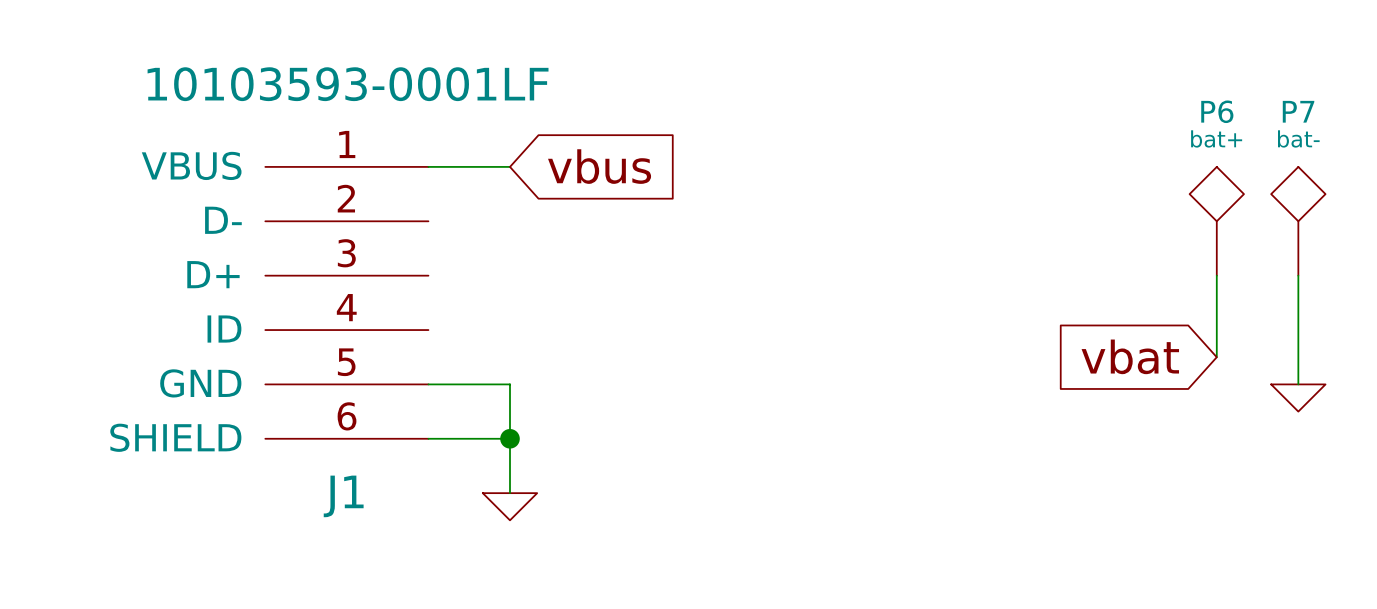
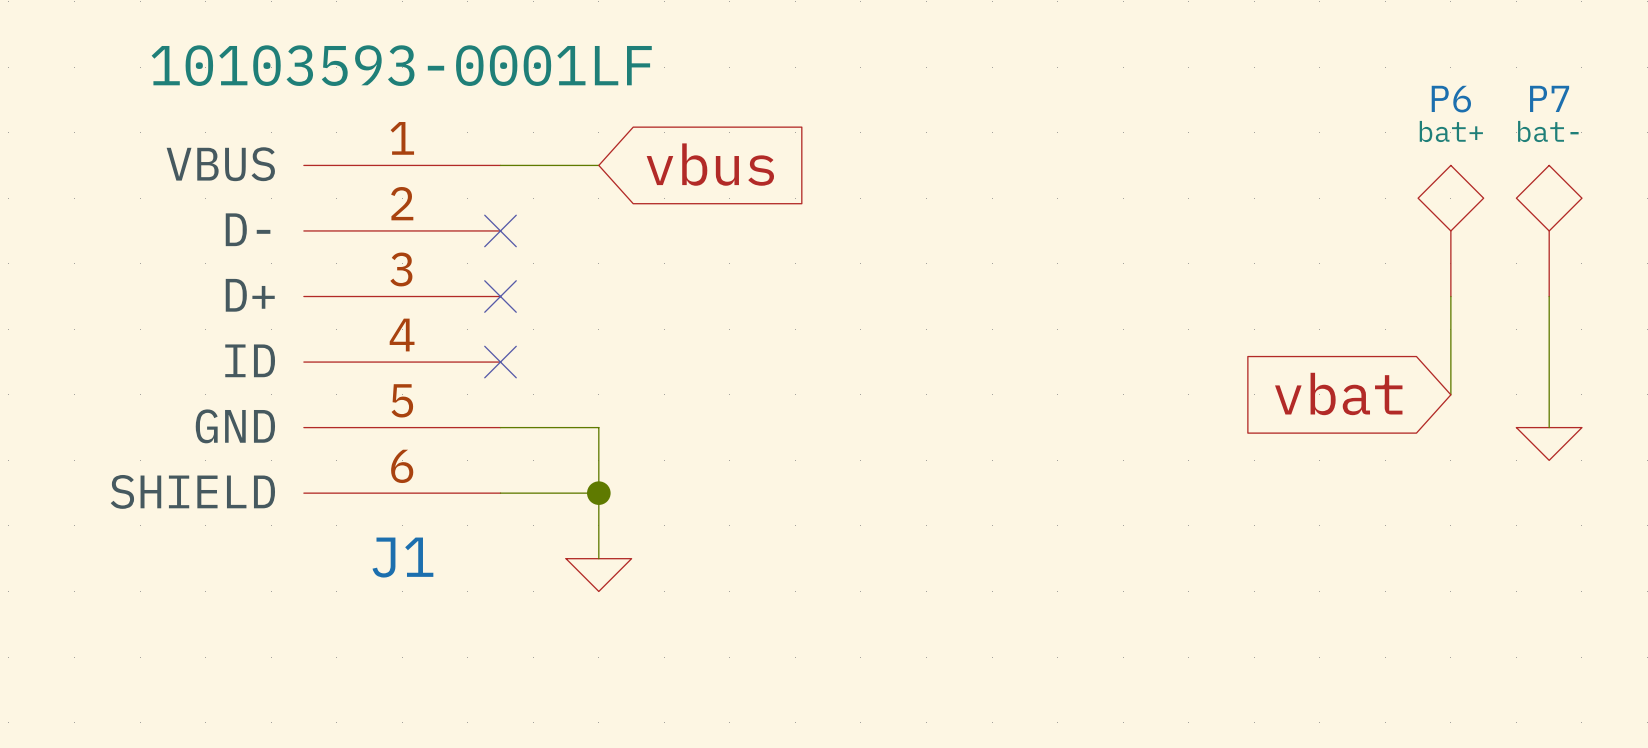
no-connect mark: none -> (500, 230)
no-connect mark: none -> (500, 296)
no-connect mark: none -> (500, 362)

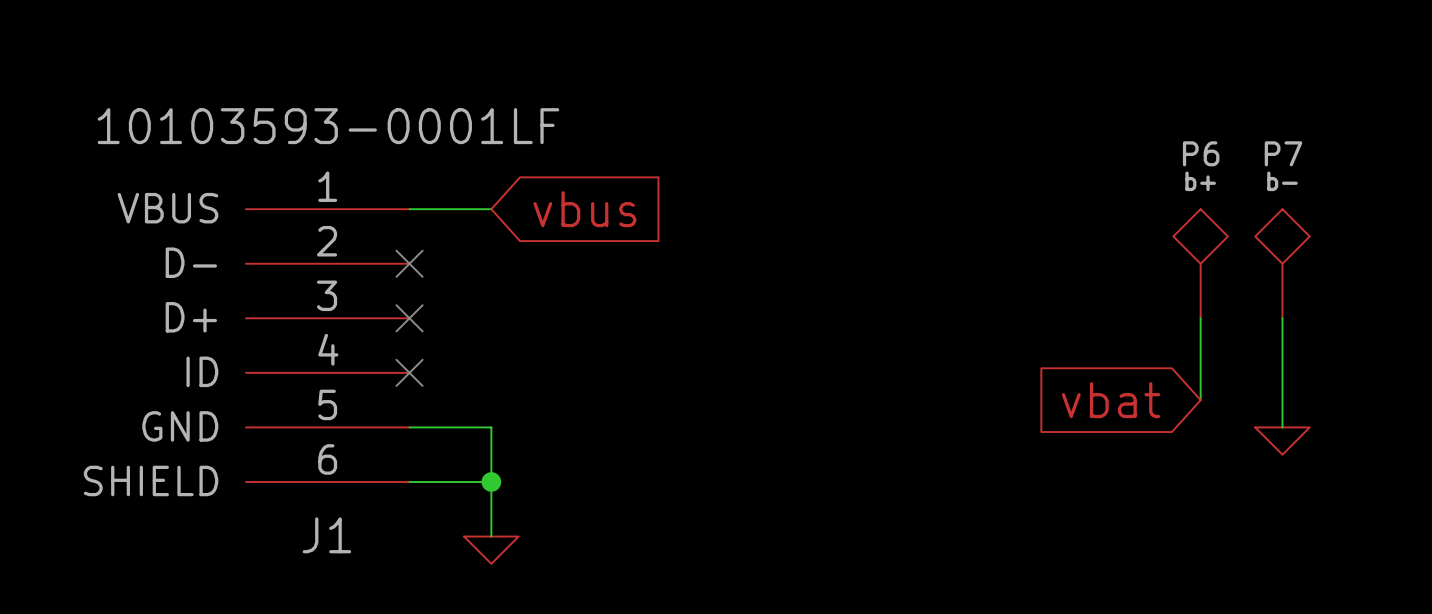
P6 value: bat+ (1451, 131) -> b+ (1200, 181)
P7 value: bat- (1548, 131) -> b- (1282, 181)

